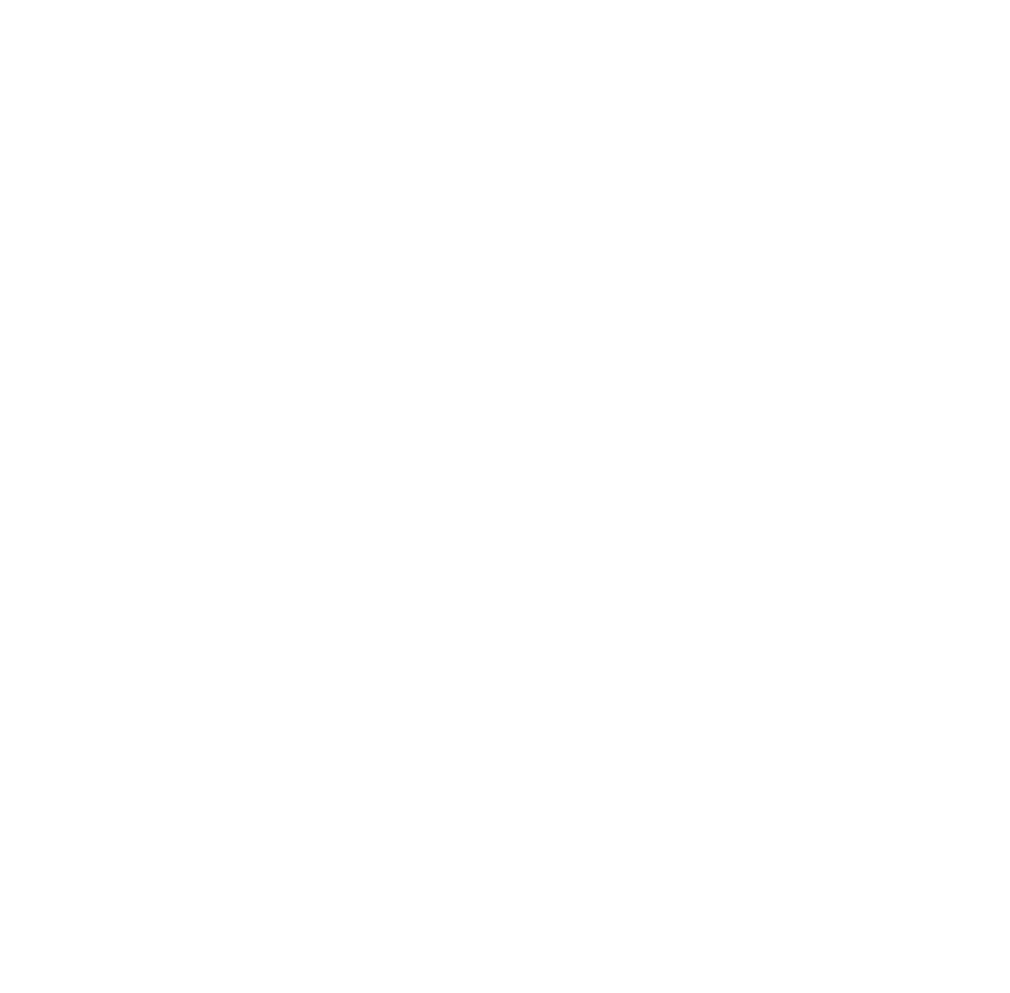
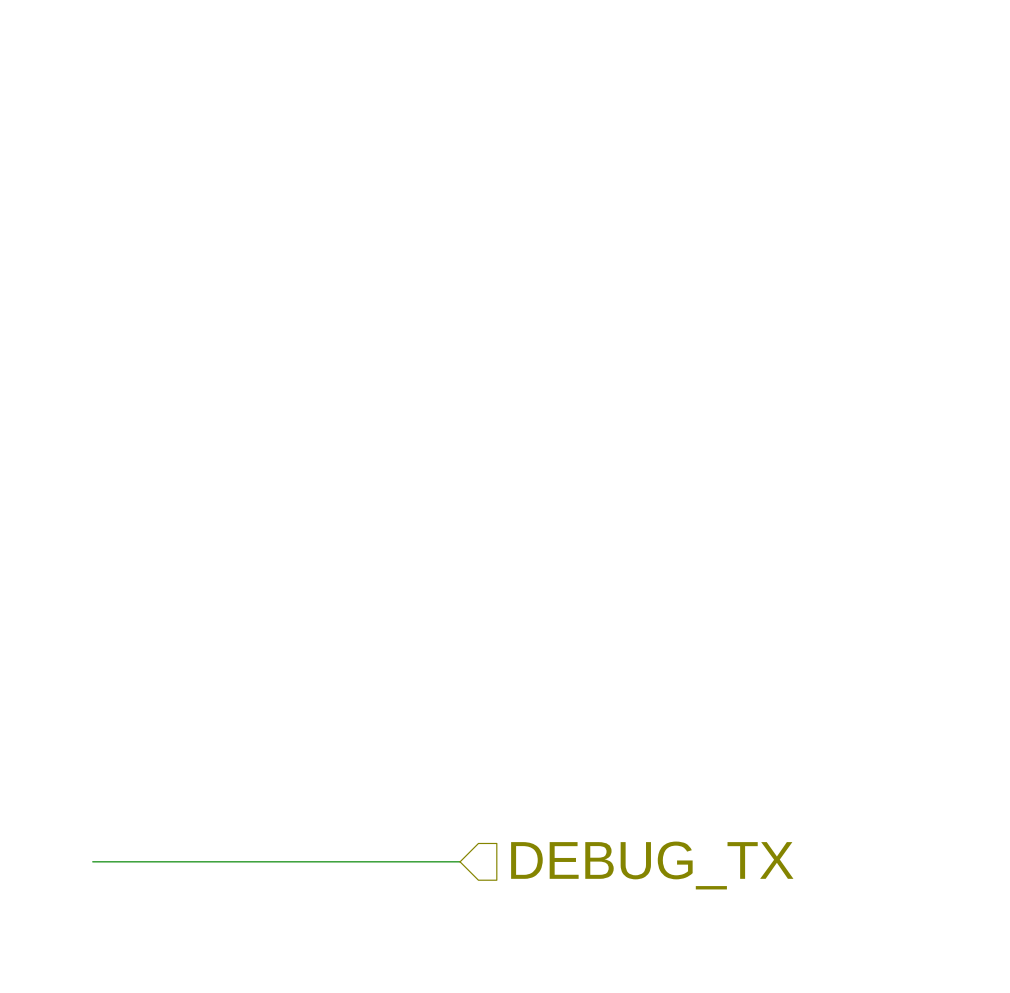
wire: none -> (92, 861) (460, 861)
hierarchical label: none -> DEBUG_TX (652, 865)

